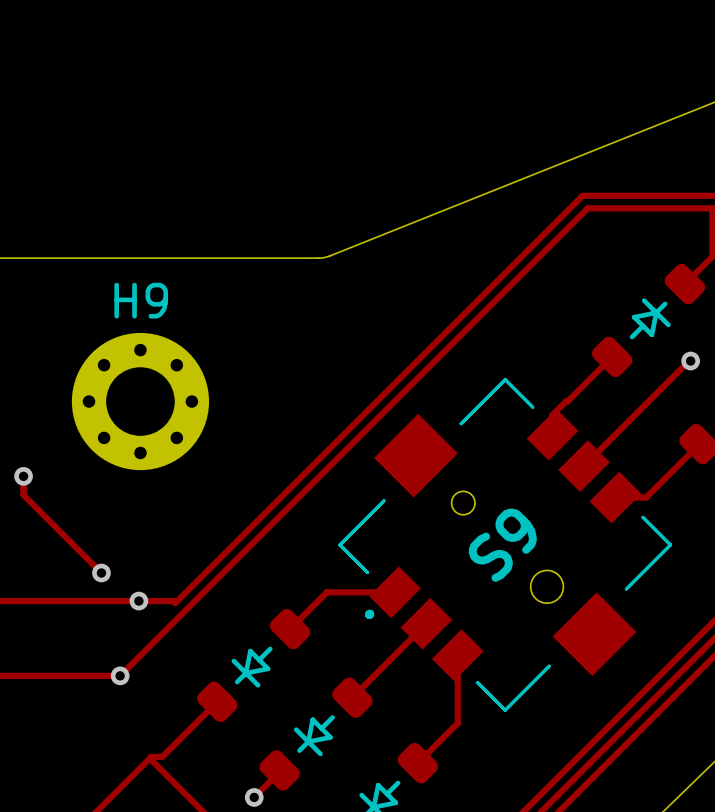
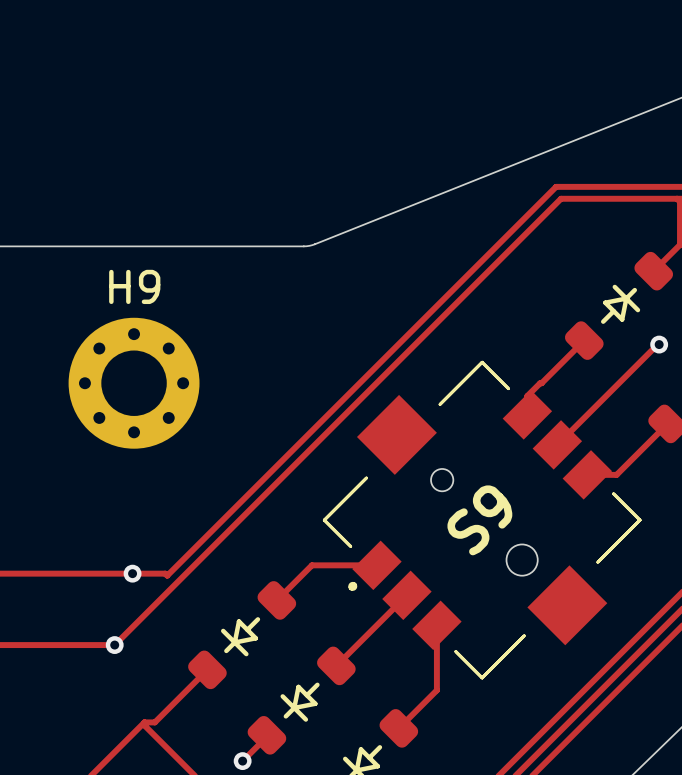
track: (23, 476) (23, 495) (101, 572) -> none
via: (23, 476) -> none
via: (101, 572) -> none

